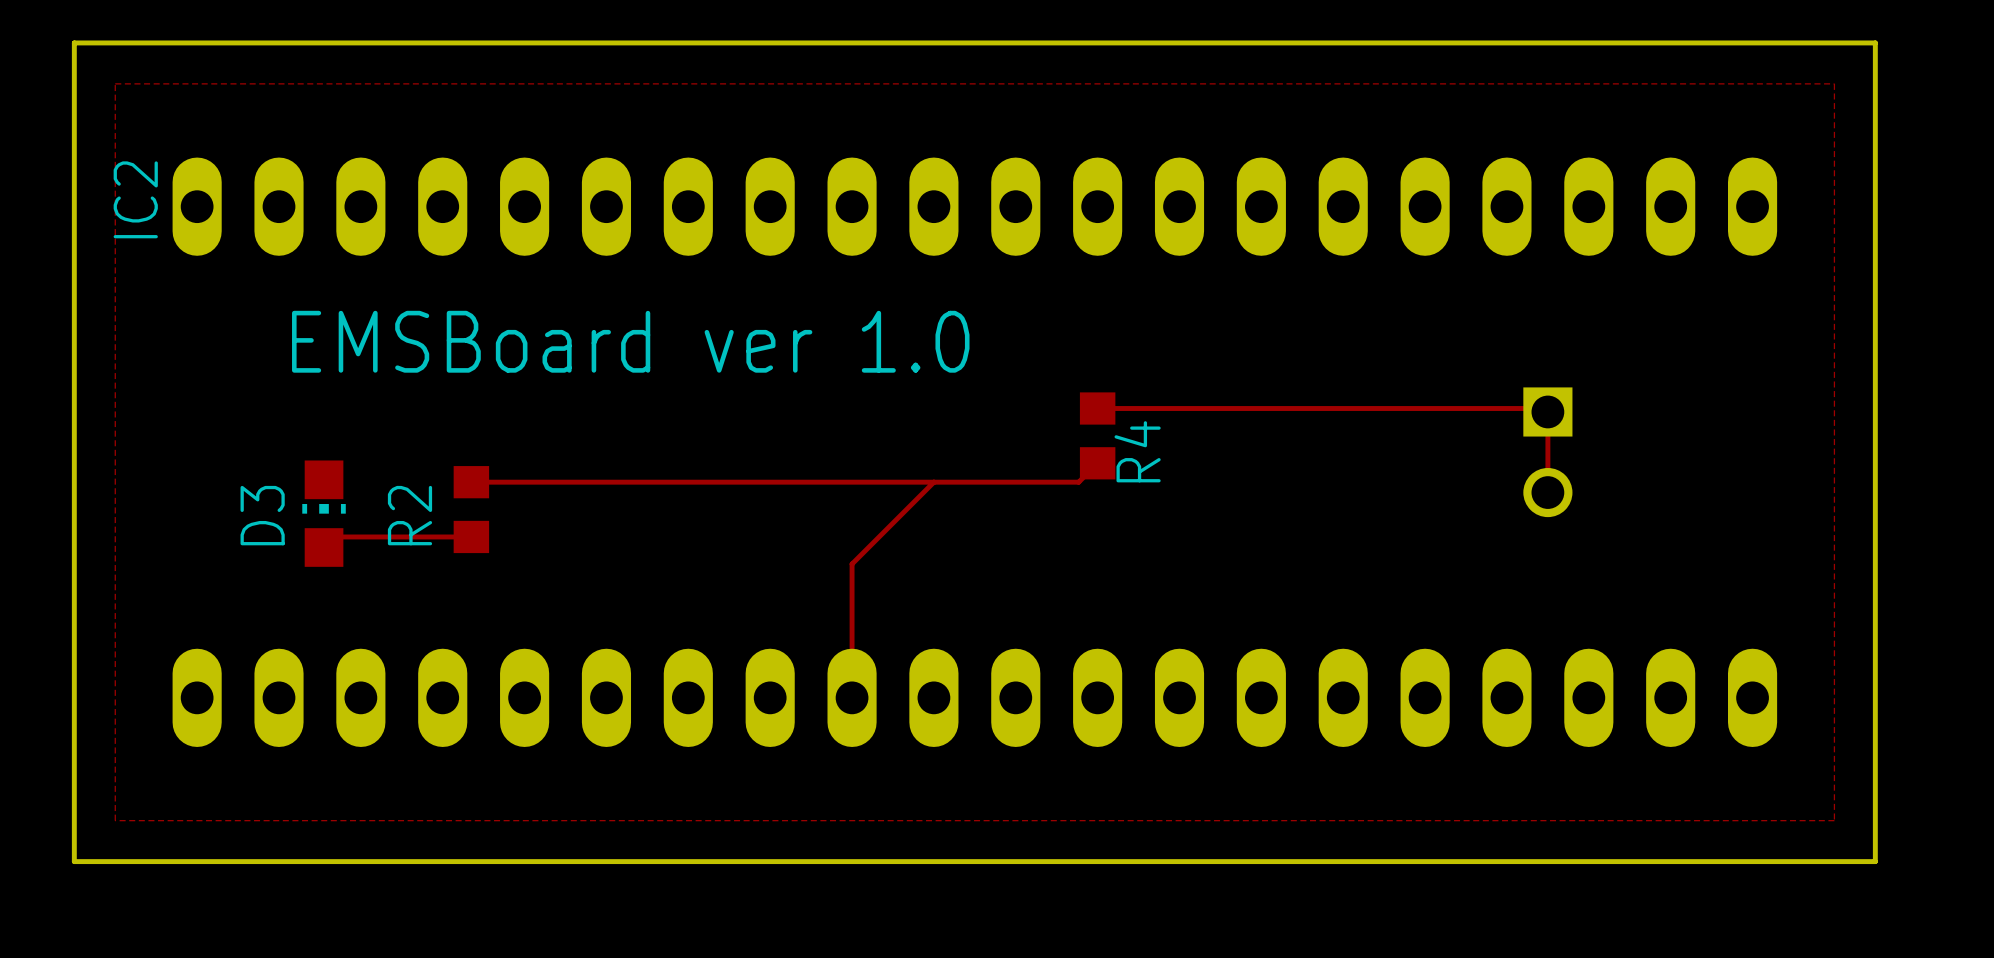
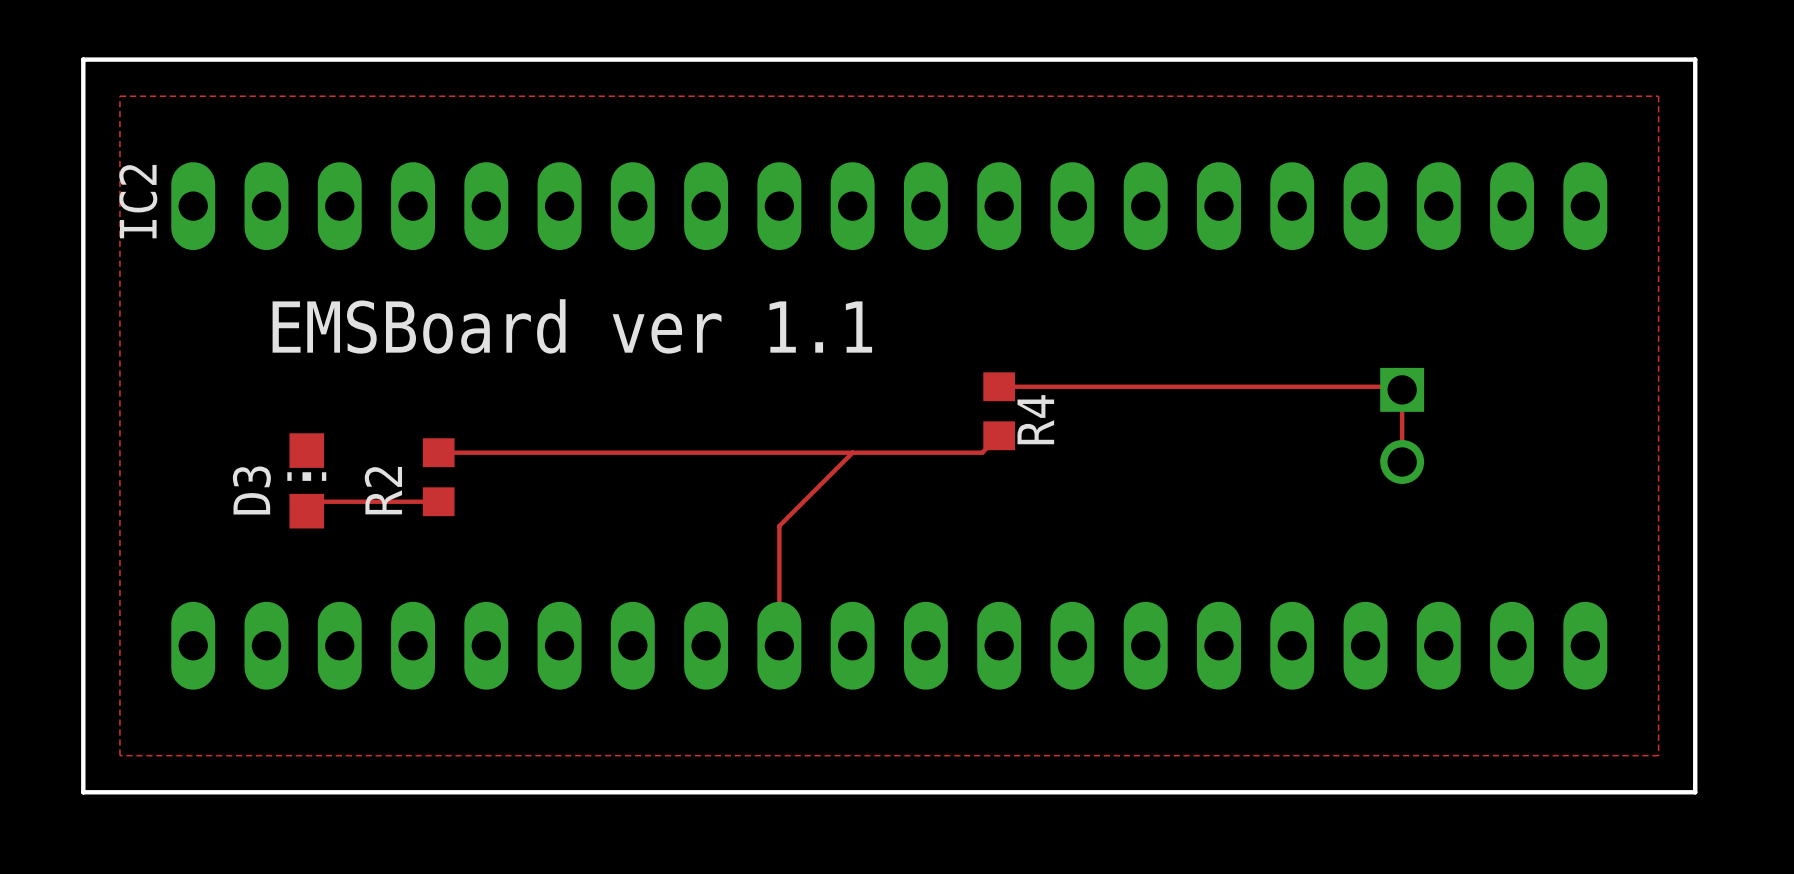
text: EMSBoard ver 1.0 (630, 341) -> EMSBoard ver 1.1 (572, 326)

